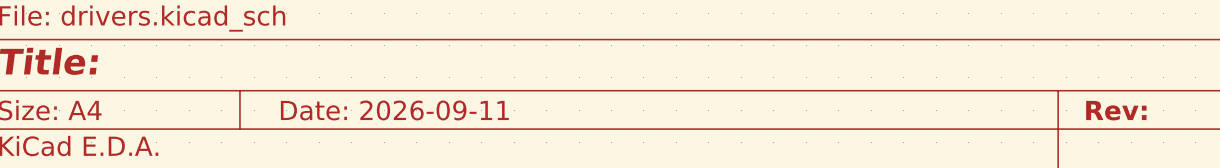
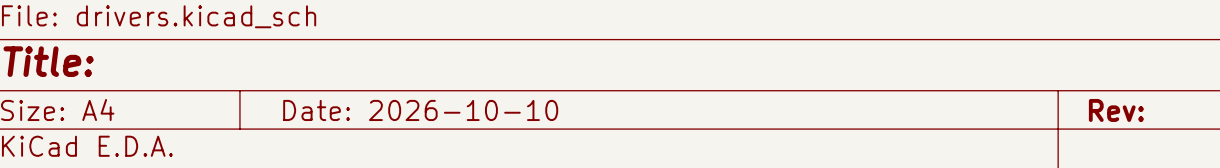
title block: Date: 2026-09-11 (394, 110) -> Date: 2026-10-10 (420, 110)

